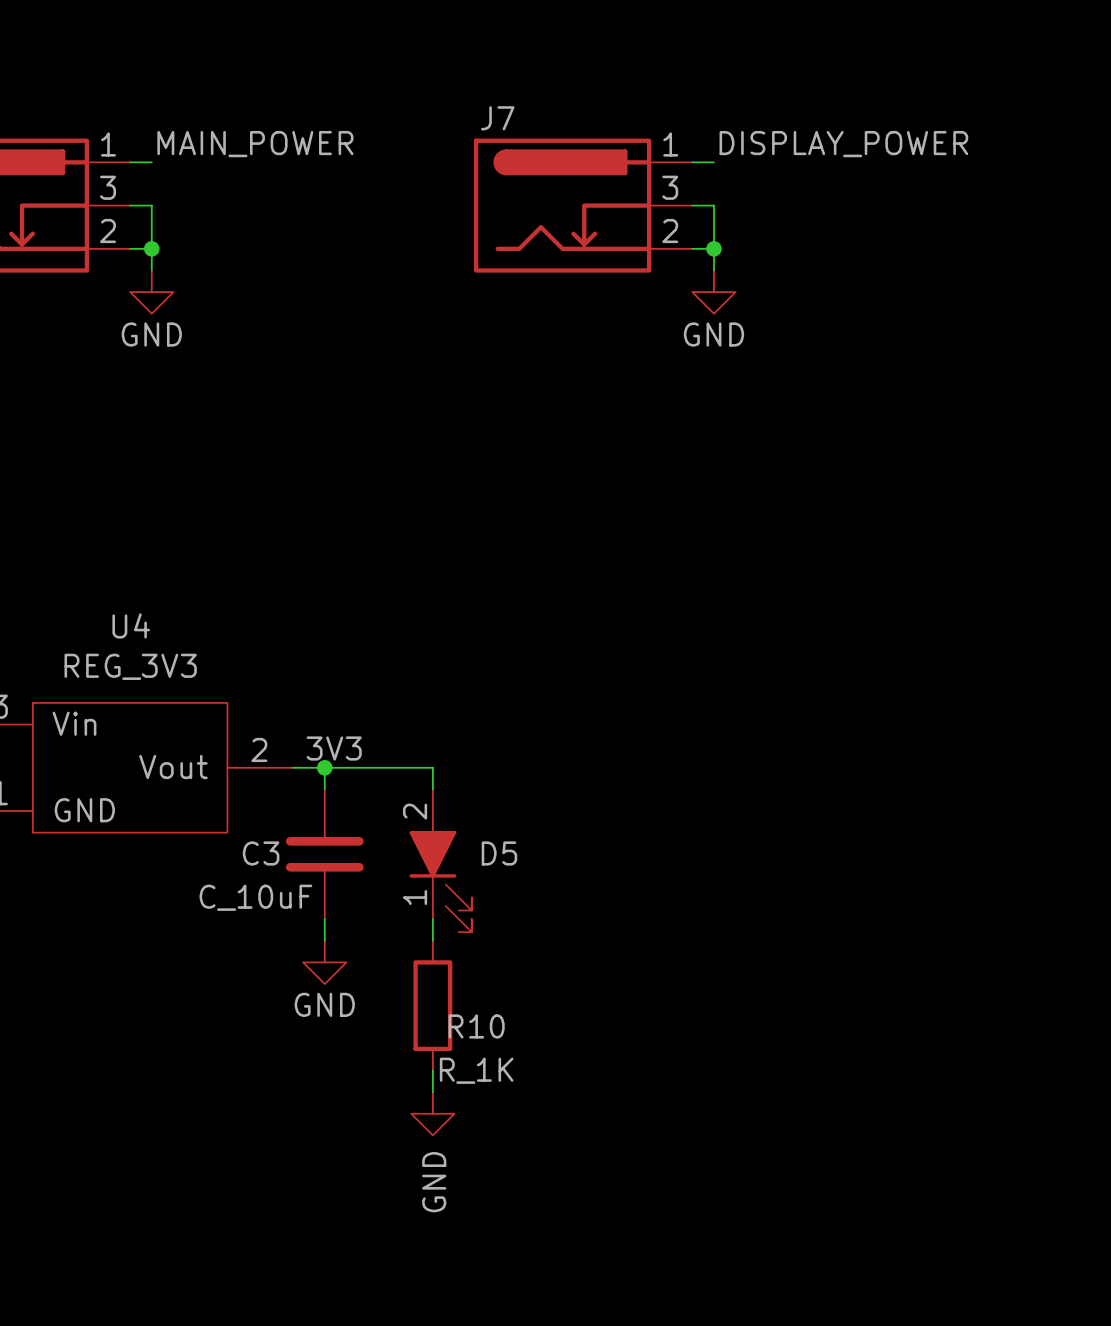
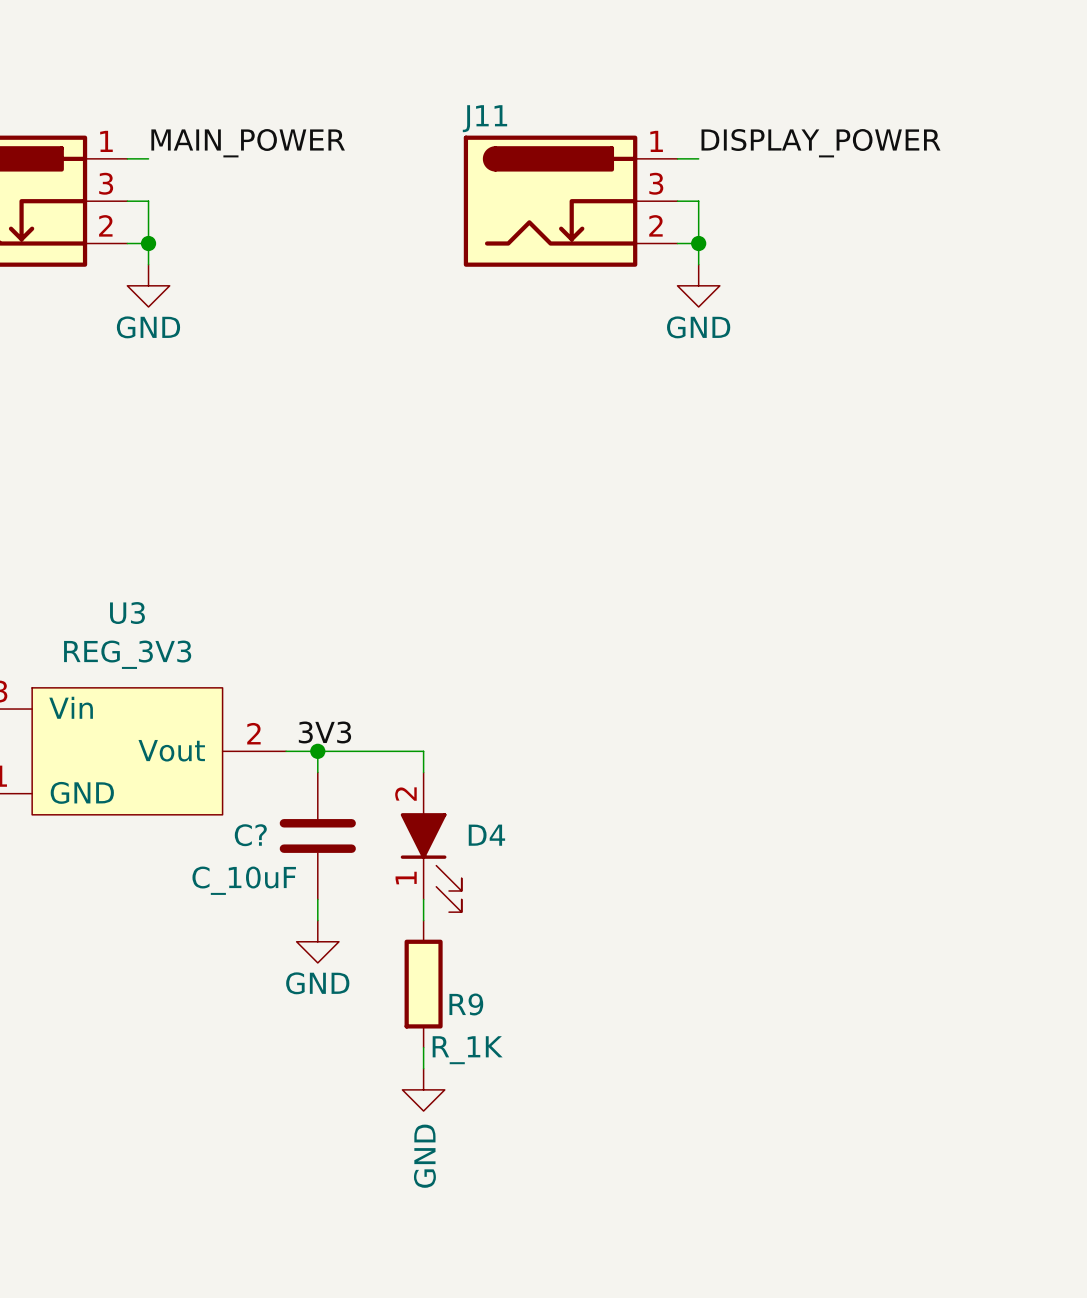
J7 name: J7 (497, 118) -> J11 (484, 118)
U4 name: U4 (131, 625) -> U3 (127, 613)
C3 name: C3 (261, 853) -> C? (250, 835)
D5 name: D5 (499, 853) -> D4 (486, 835)
R10 name: R10 (476, 1026) -> R9 (466, 1004)

